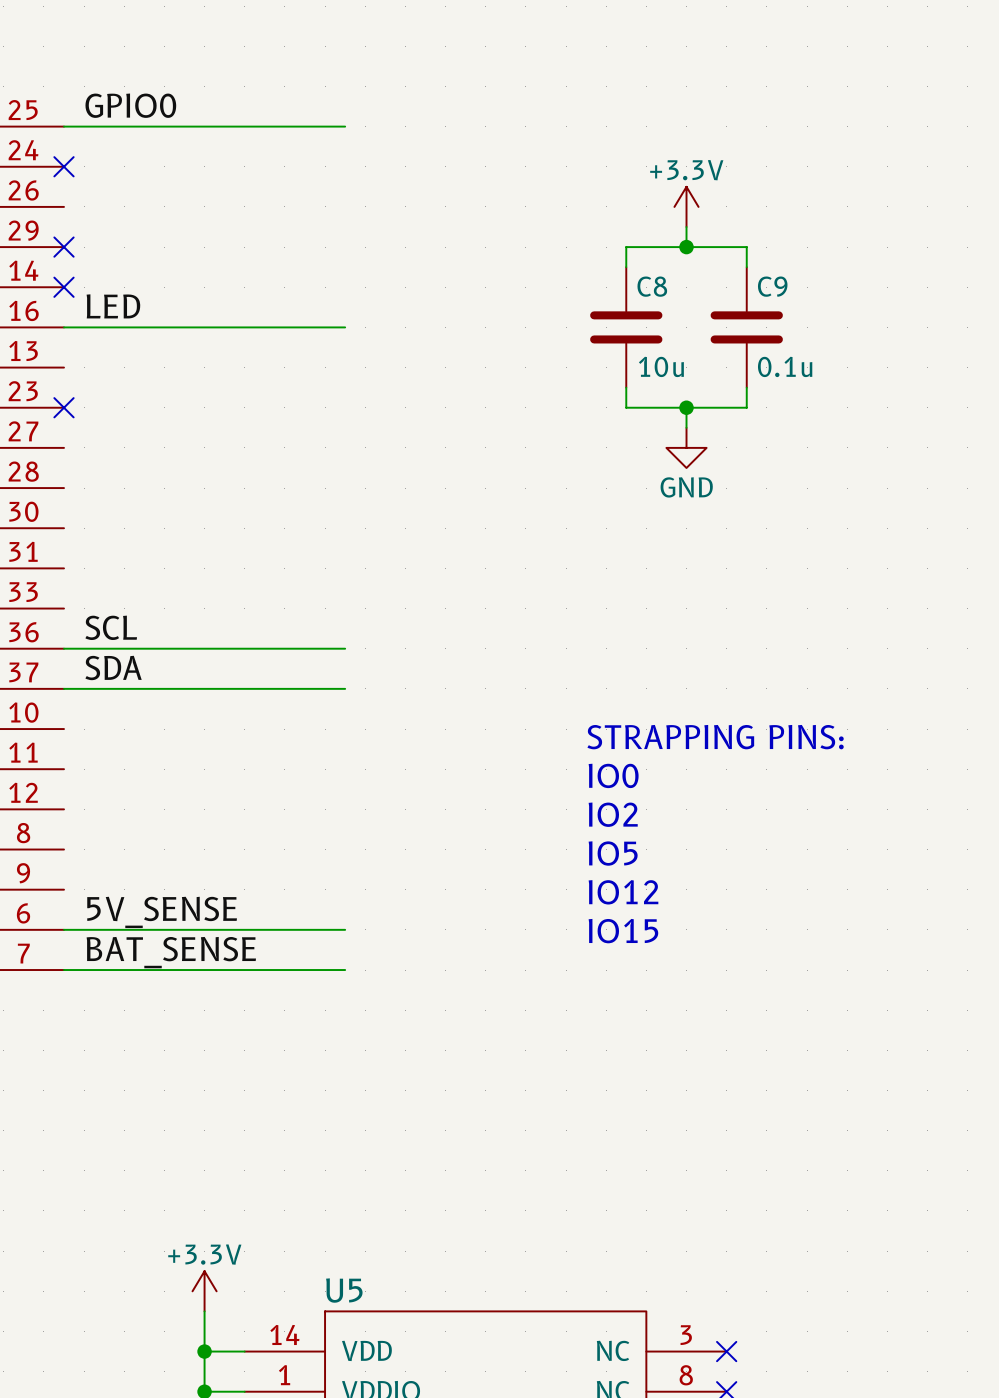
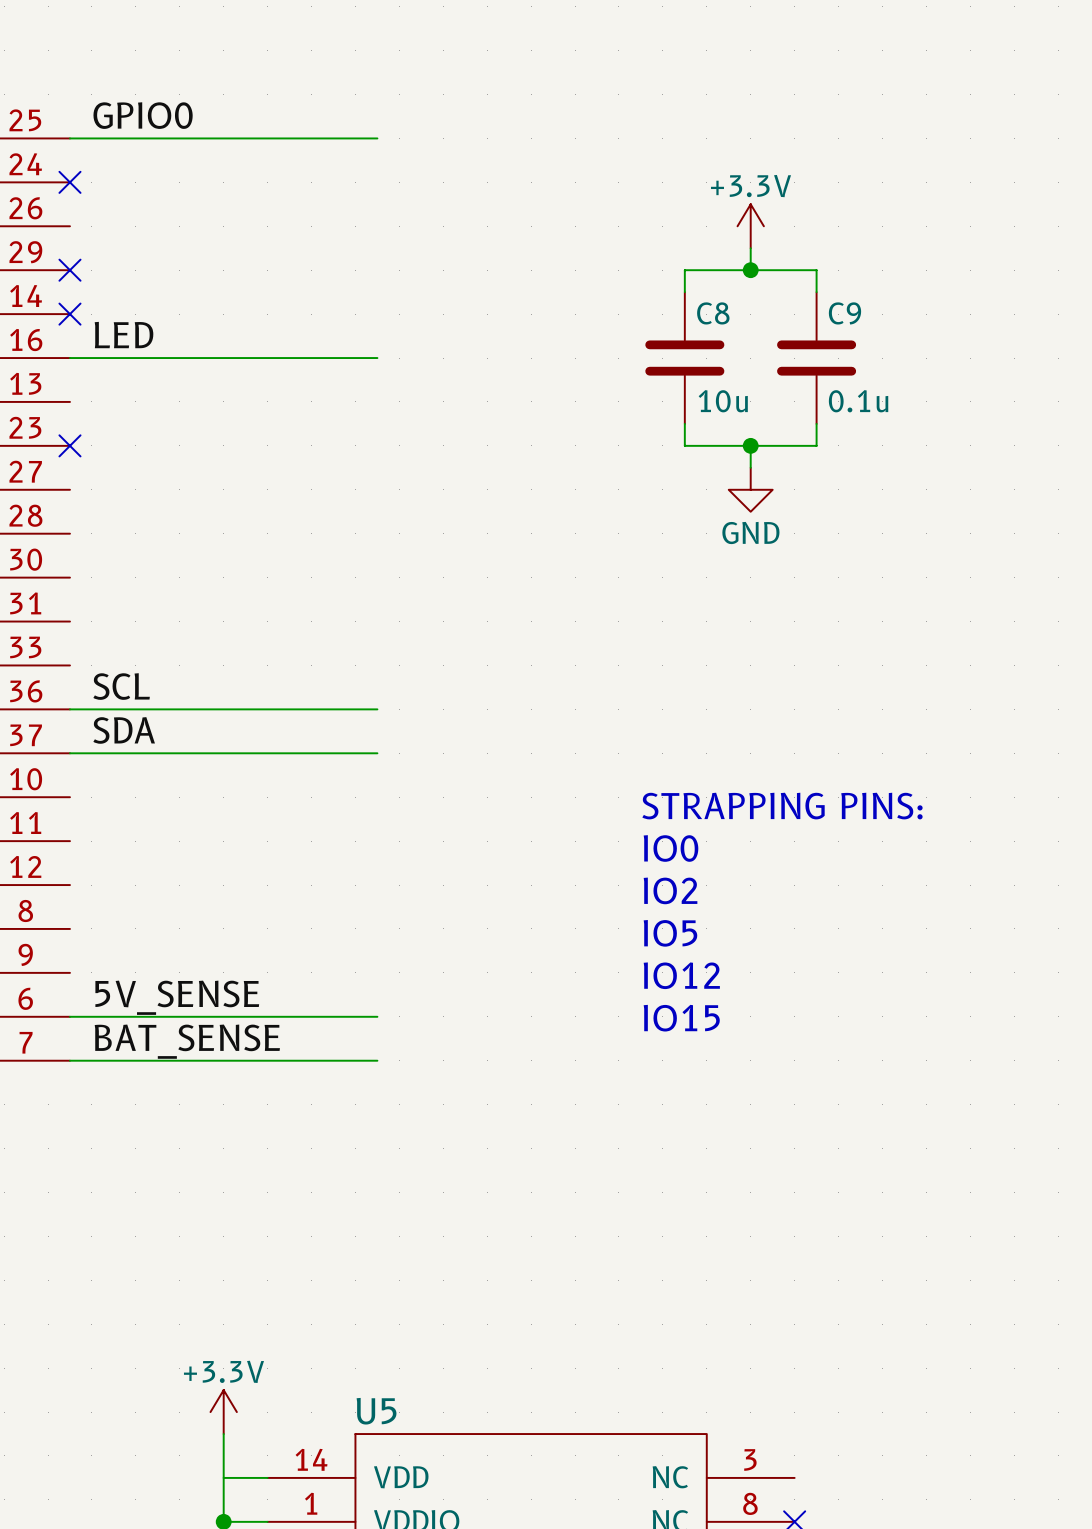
junction: (204, 1351) -> none
no-connect mark: (726, 1351) -> none

